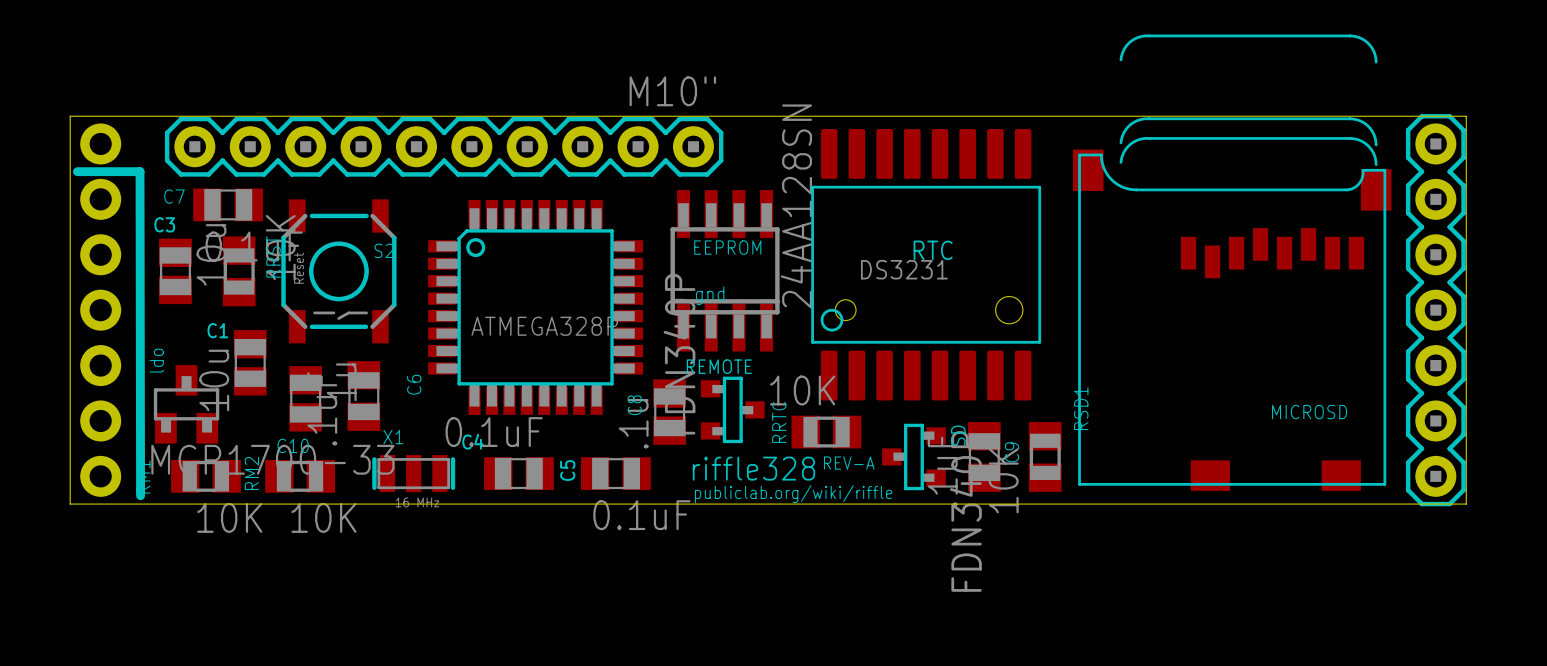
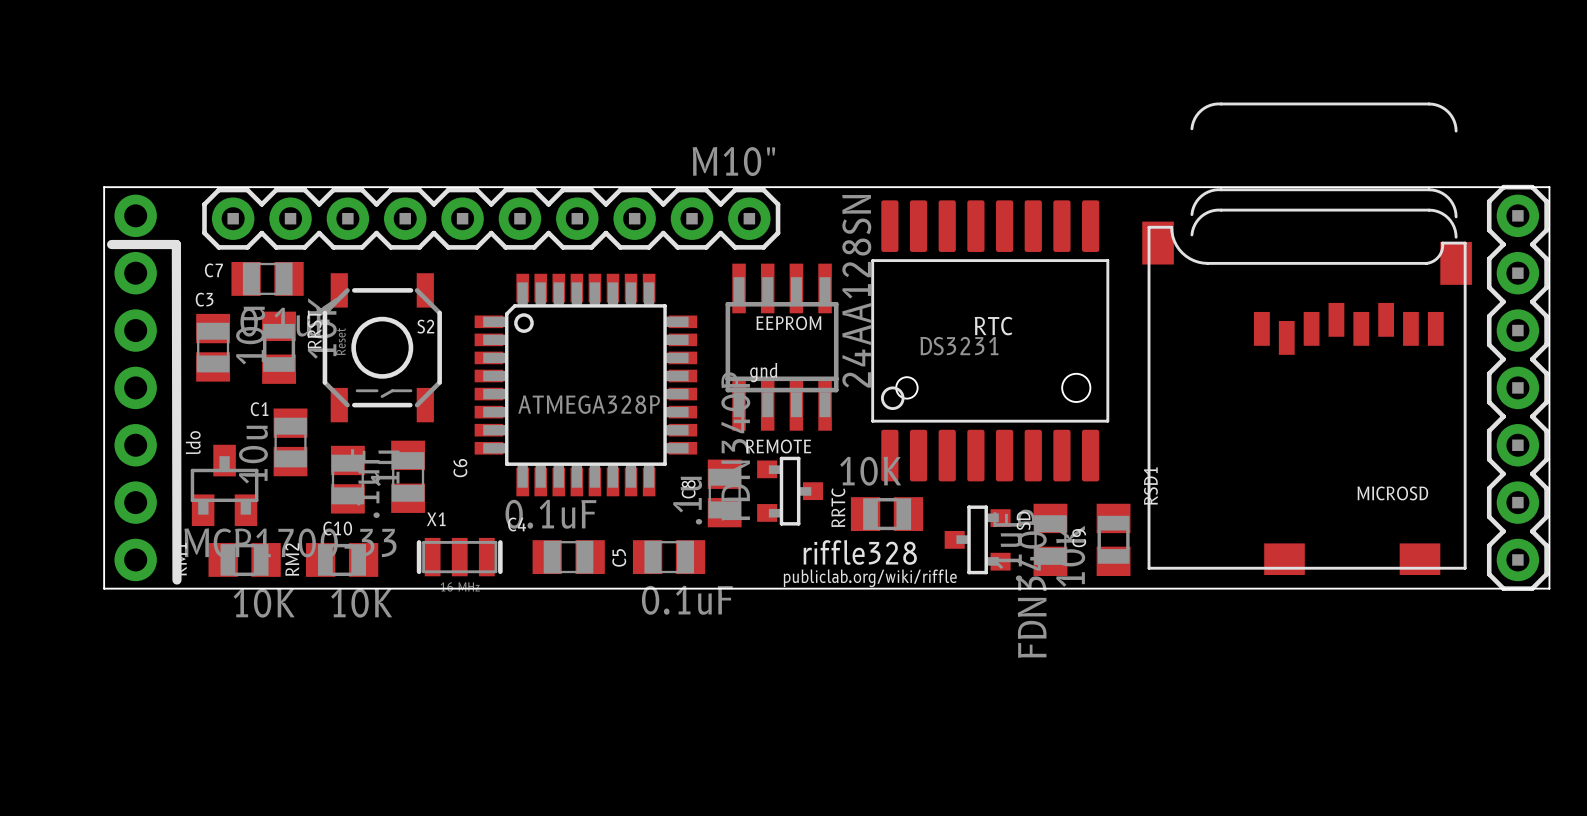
text: REV-A (849, 463) -> none
text position: riffle328 (753, 468) -> riffle328 (860, 552)

